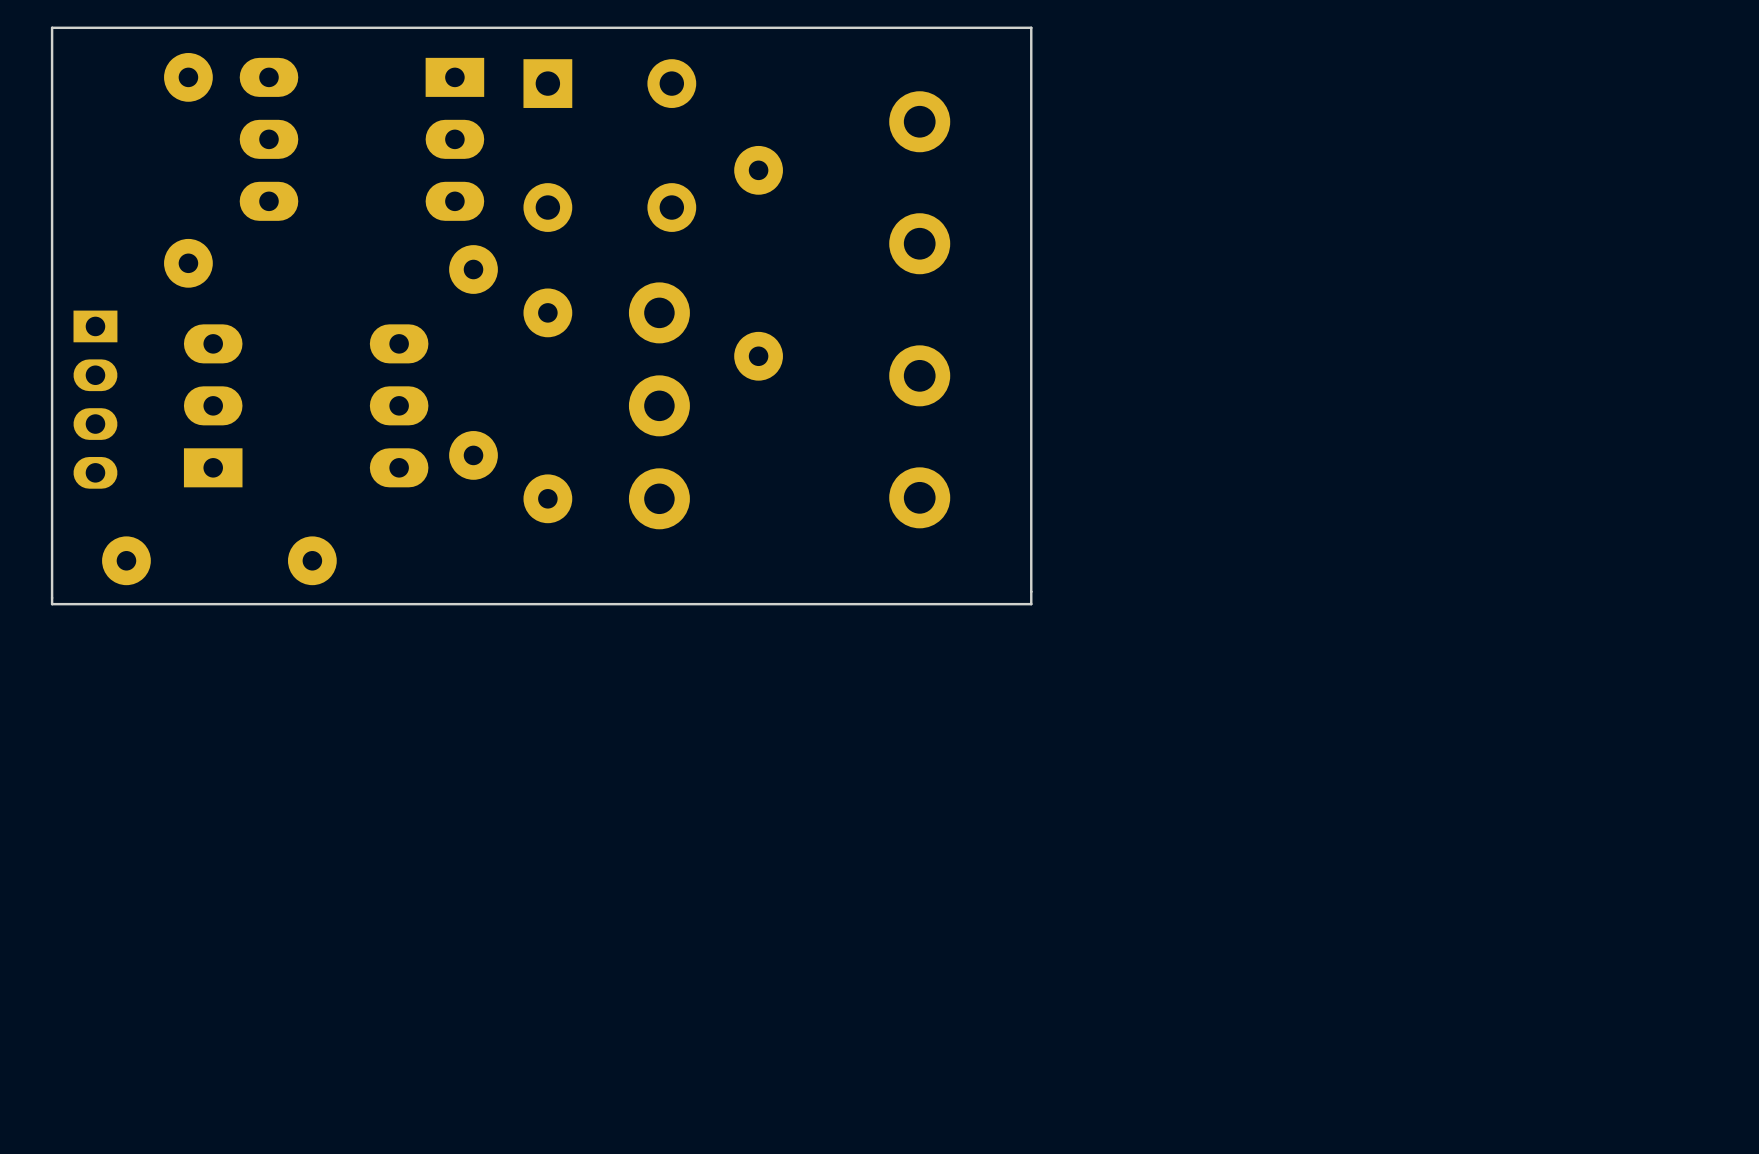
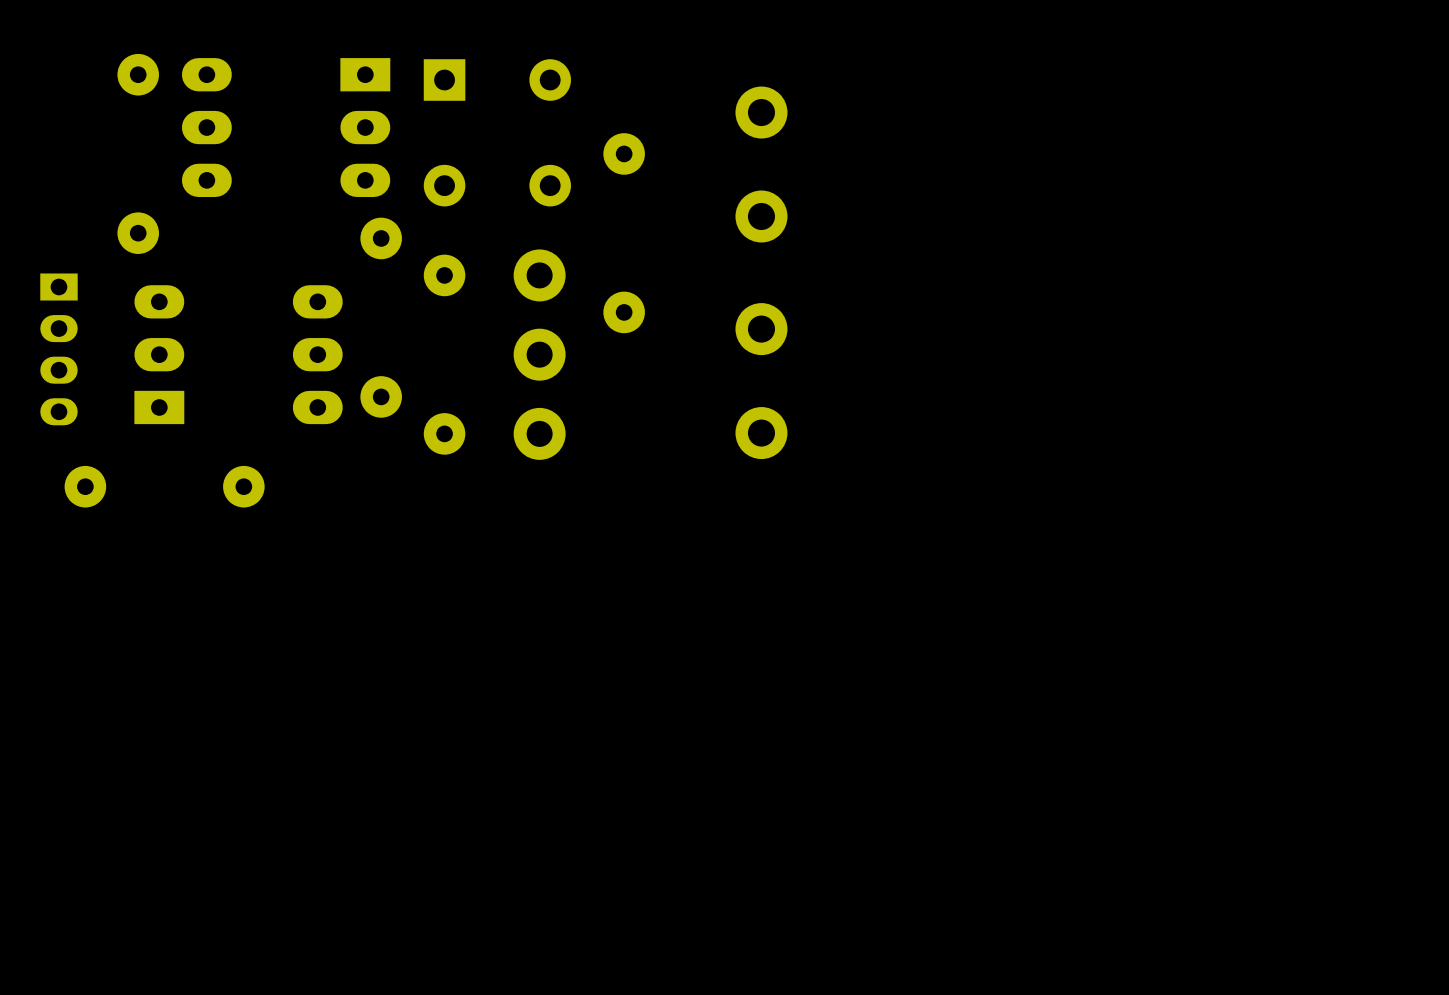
board edge: (1031, 27) (1031, 604) (52, 604) (52, 27) (1031, 27) -> none

